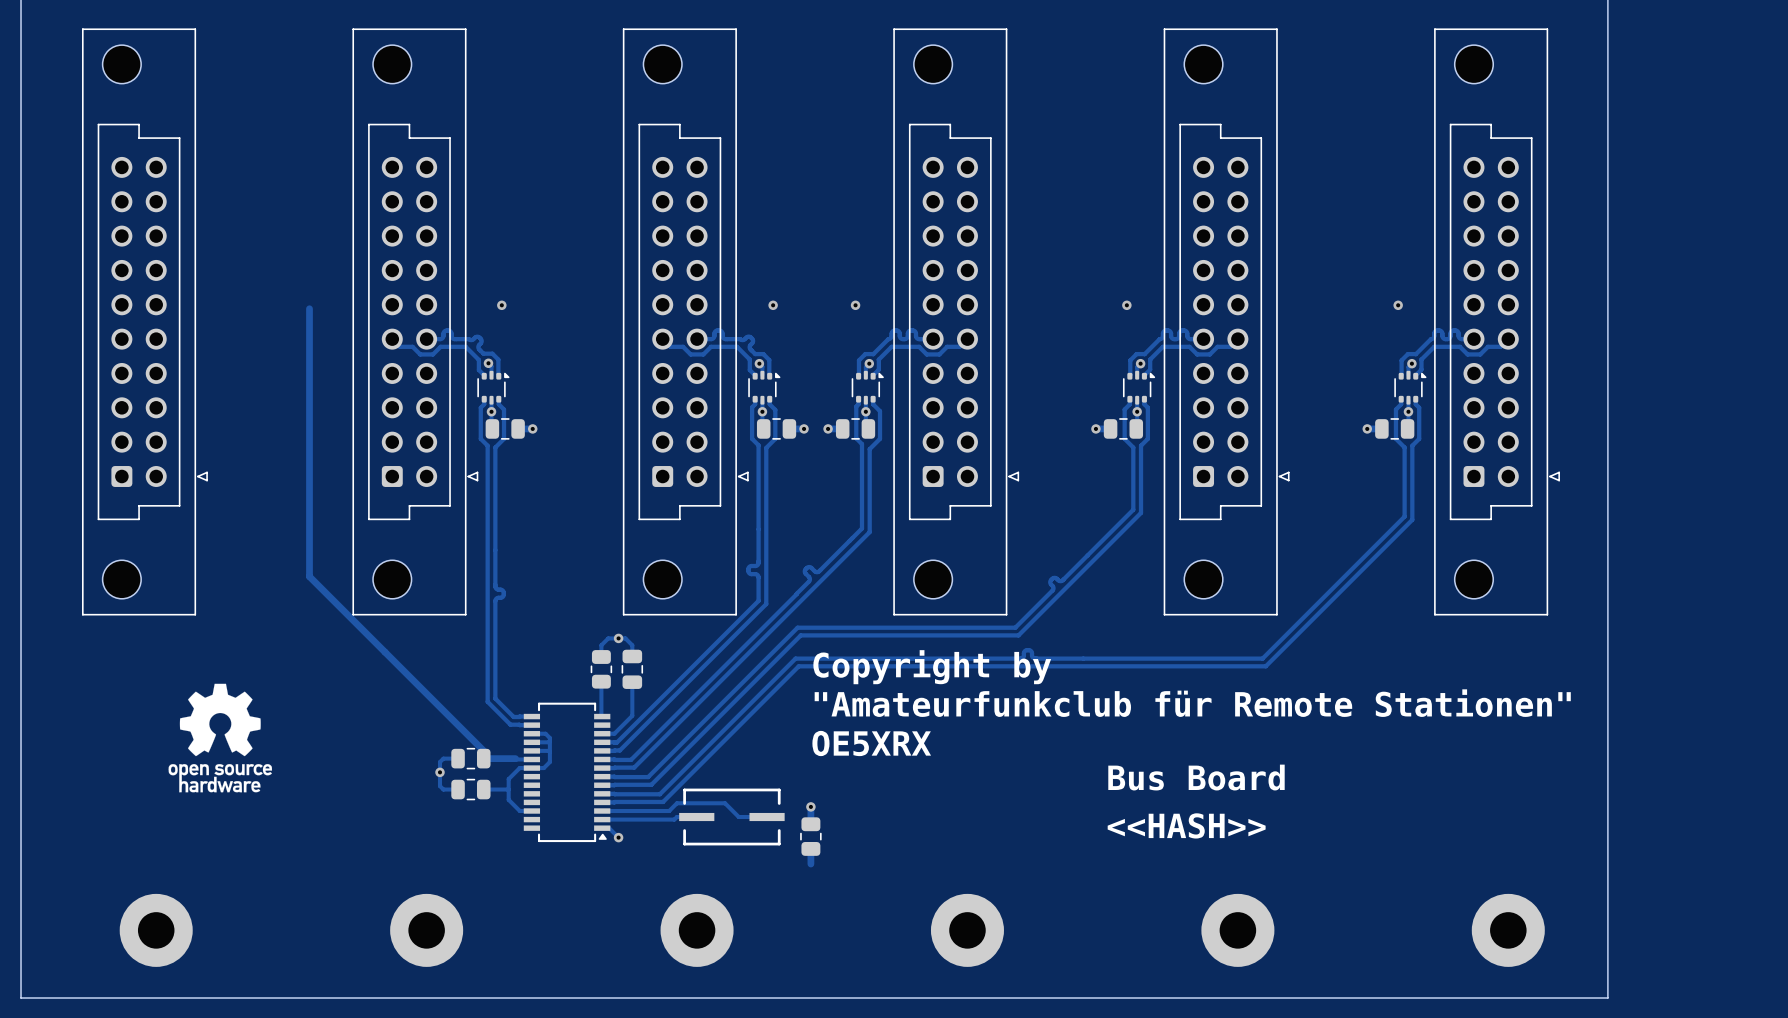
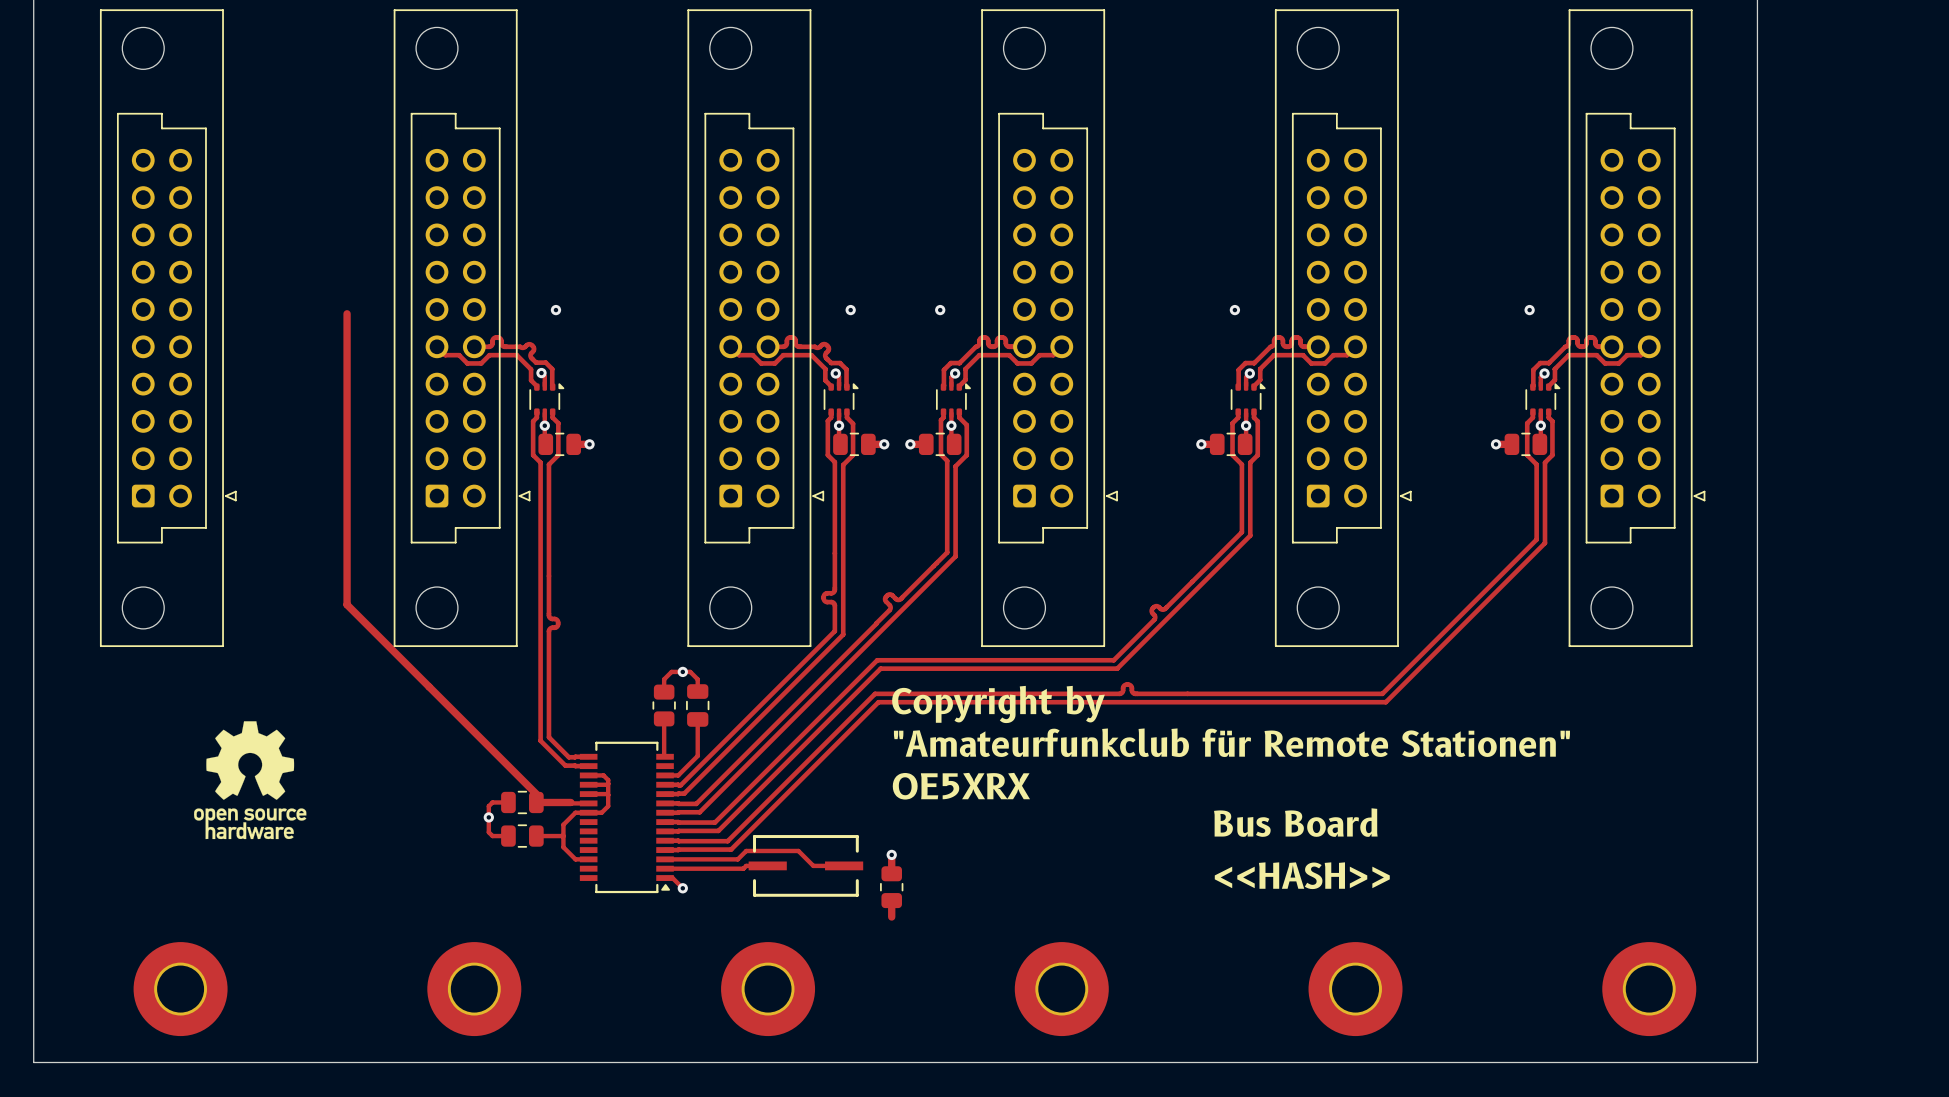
part footprint: [119, 893, 193, 967] -> [133, 942, 228, 1037]
part footprint: [390, 893, 464, 967] -> [427, 942, 522, 1037]
part footprint: [660, 893, 734, 967] -> [721, 942, 816, 1037]
part footprint: [930, 893, 1004, 967] -> [1014, 942, 1109, 1037]
part footprint: [1201, 893, 1275, 967] -> [1308, 942, 1403, 1037]
part footprint: [1471, 893, 1545, 967] -> [1602, 942, 1697, 1037]

